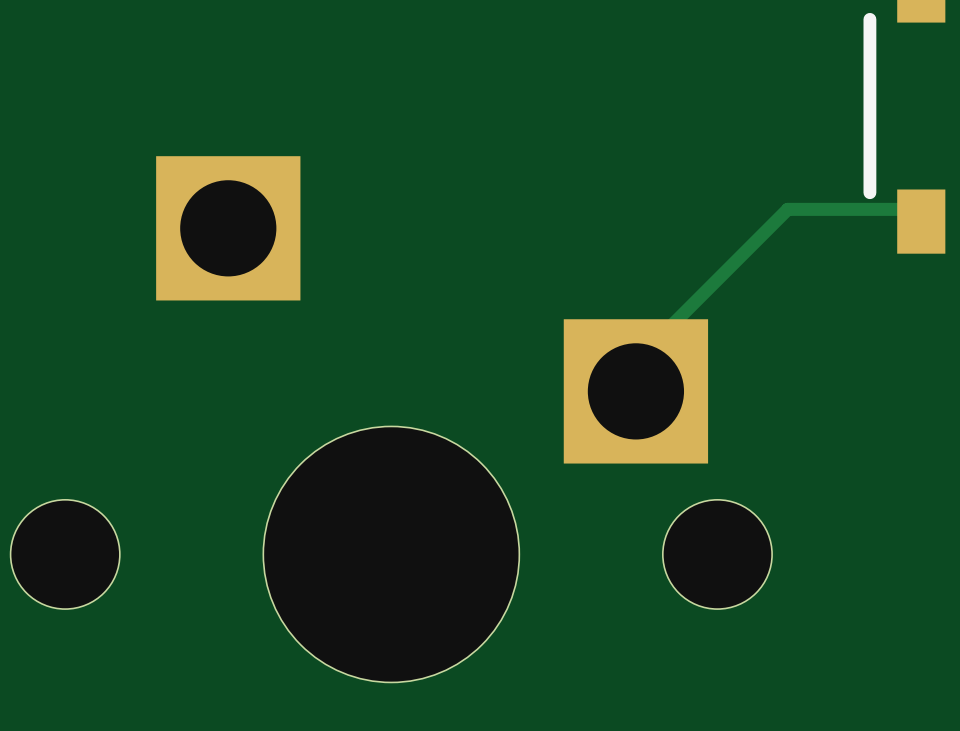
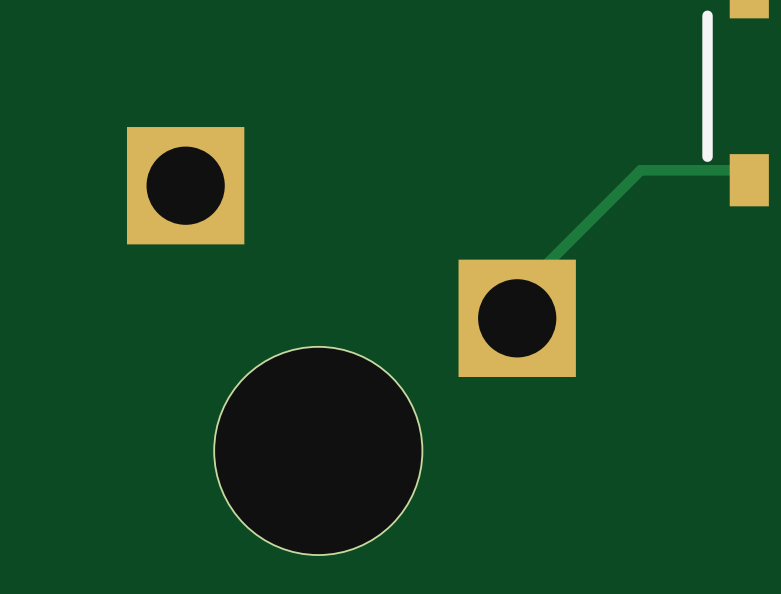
part footprint: [10, 156, 773, 683] -> [126, 127, 576, 556]

